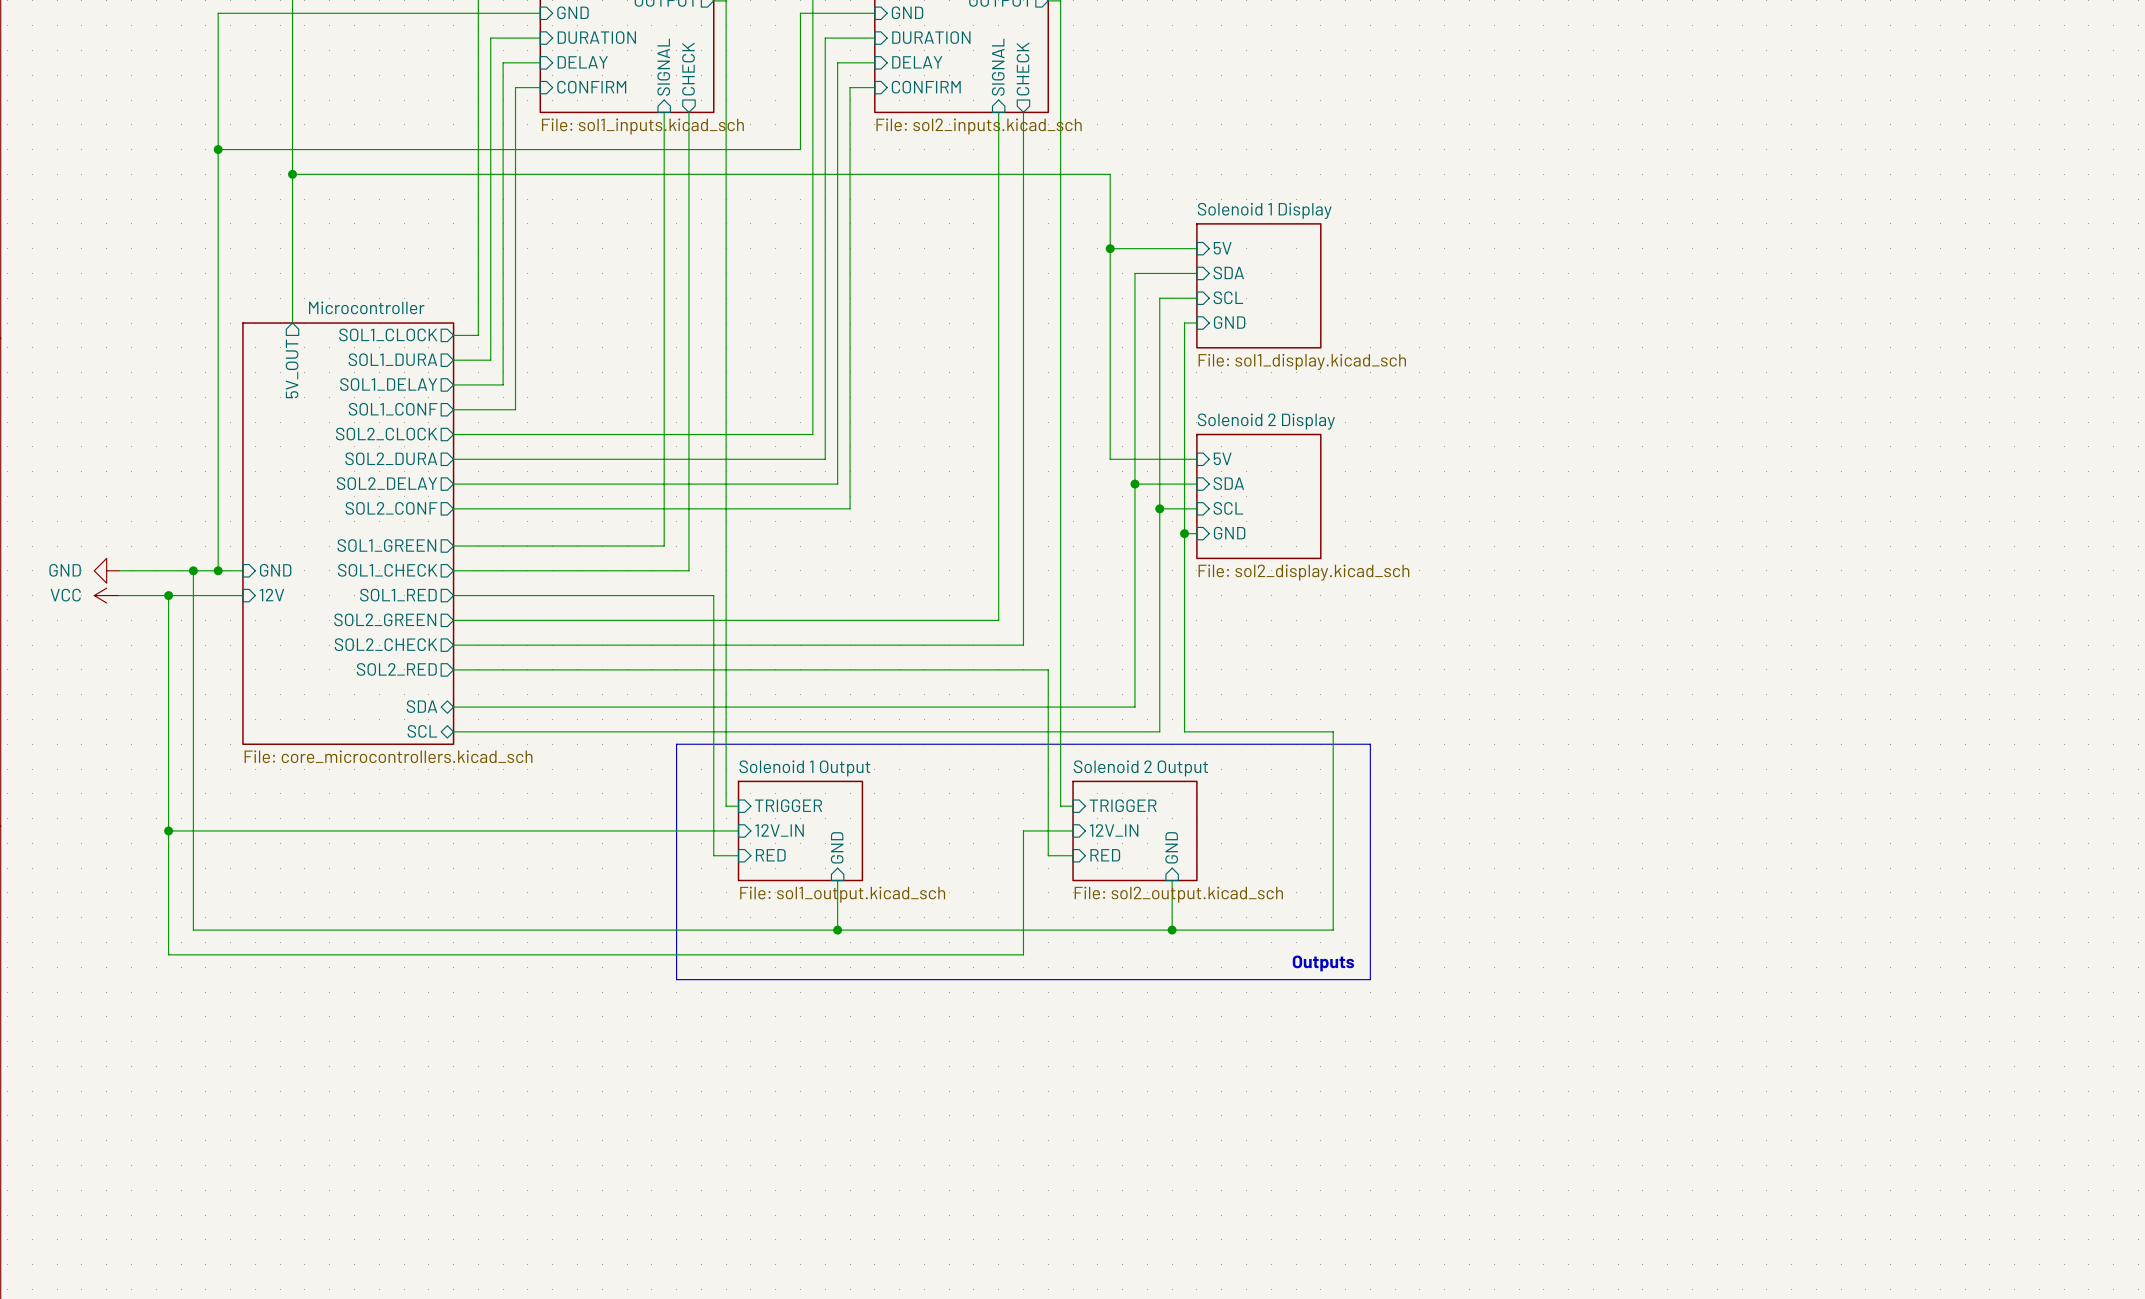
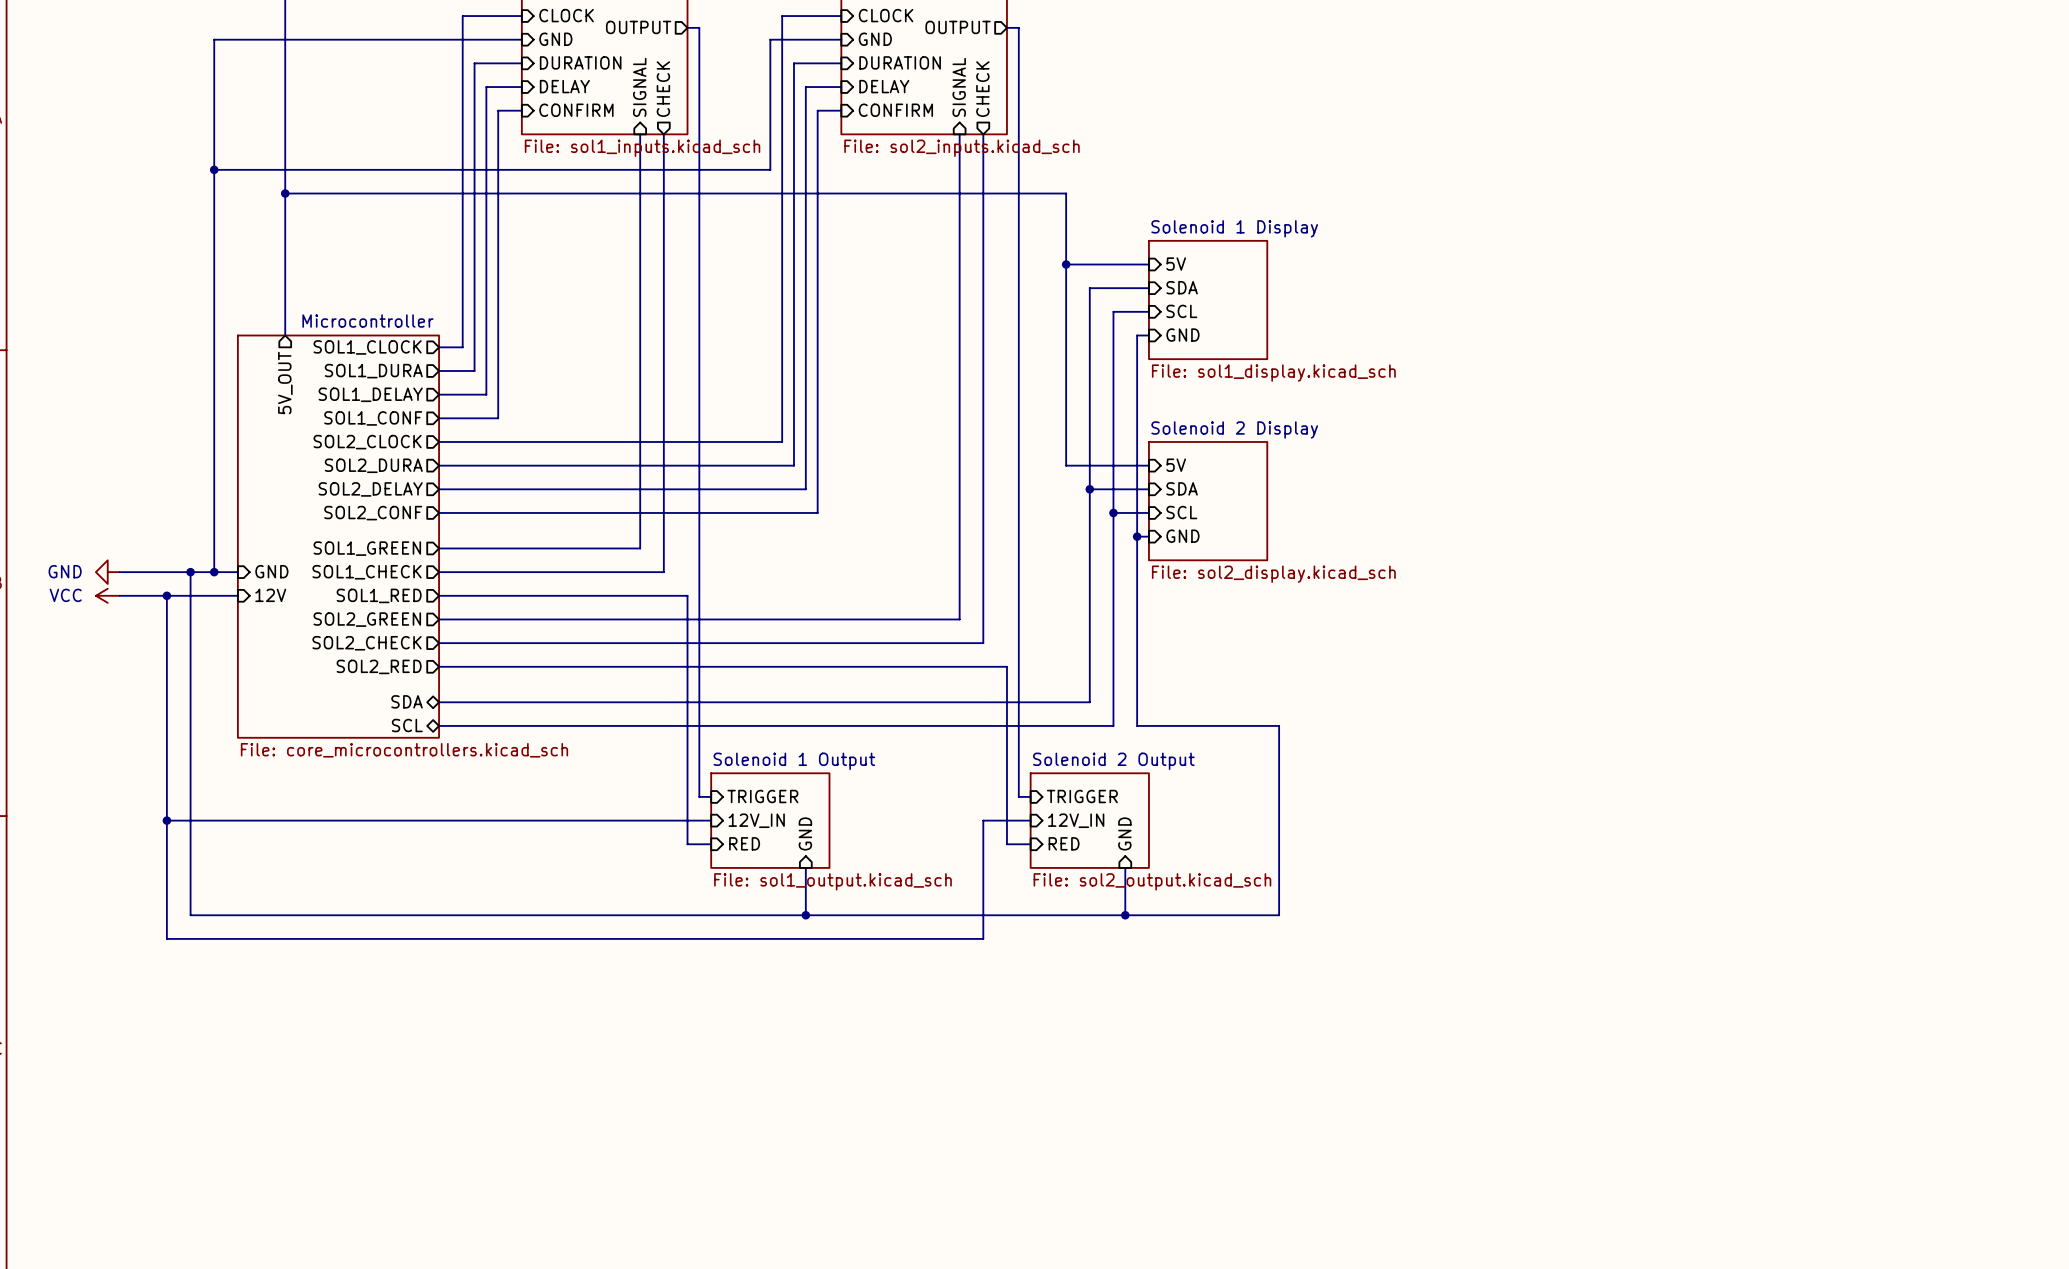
line: (676, 744) (1370, 744) (1370, 979) (676, 979) (676, 744) -> none
text: Outputs (1323, 963) -> none

